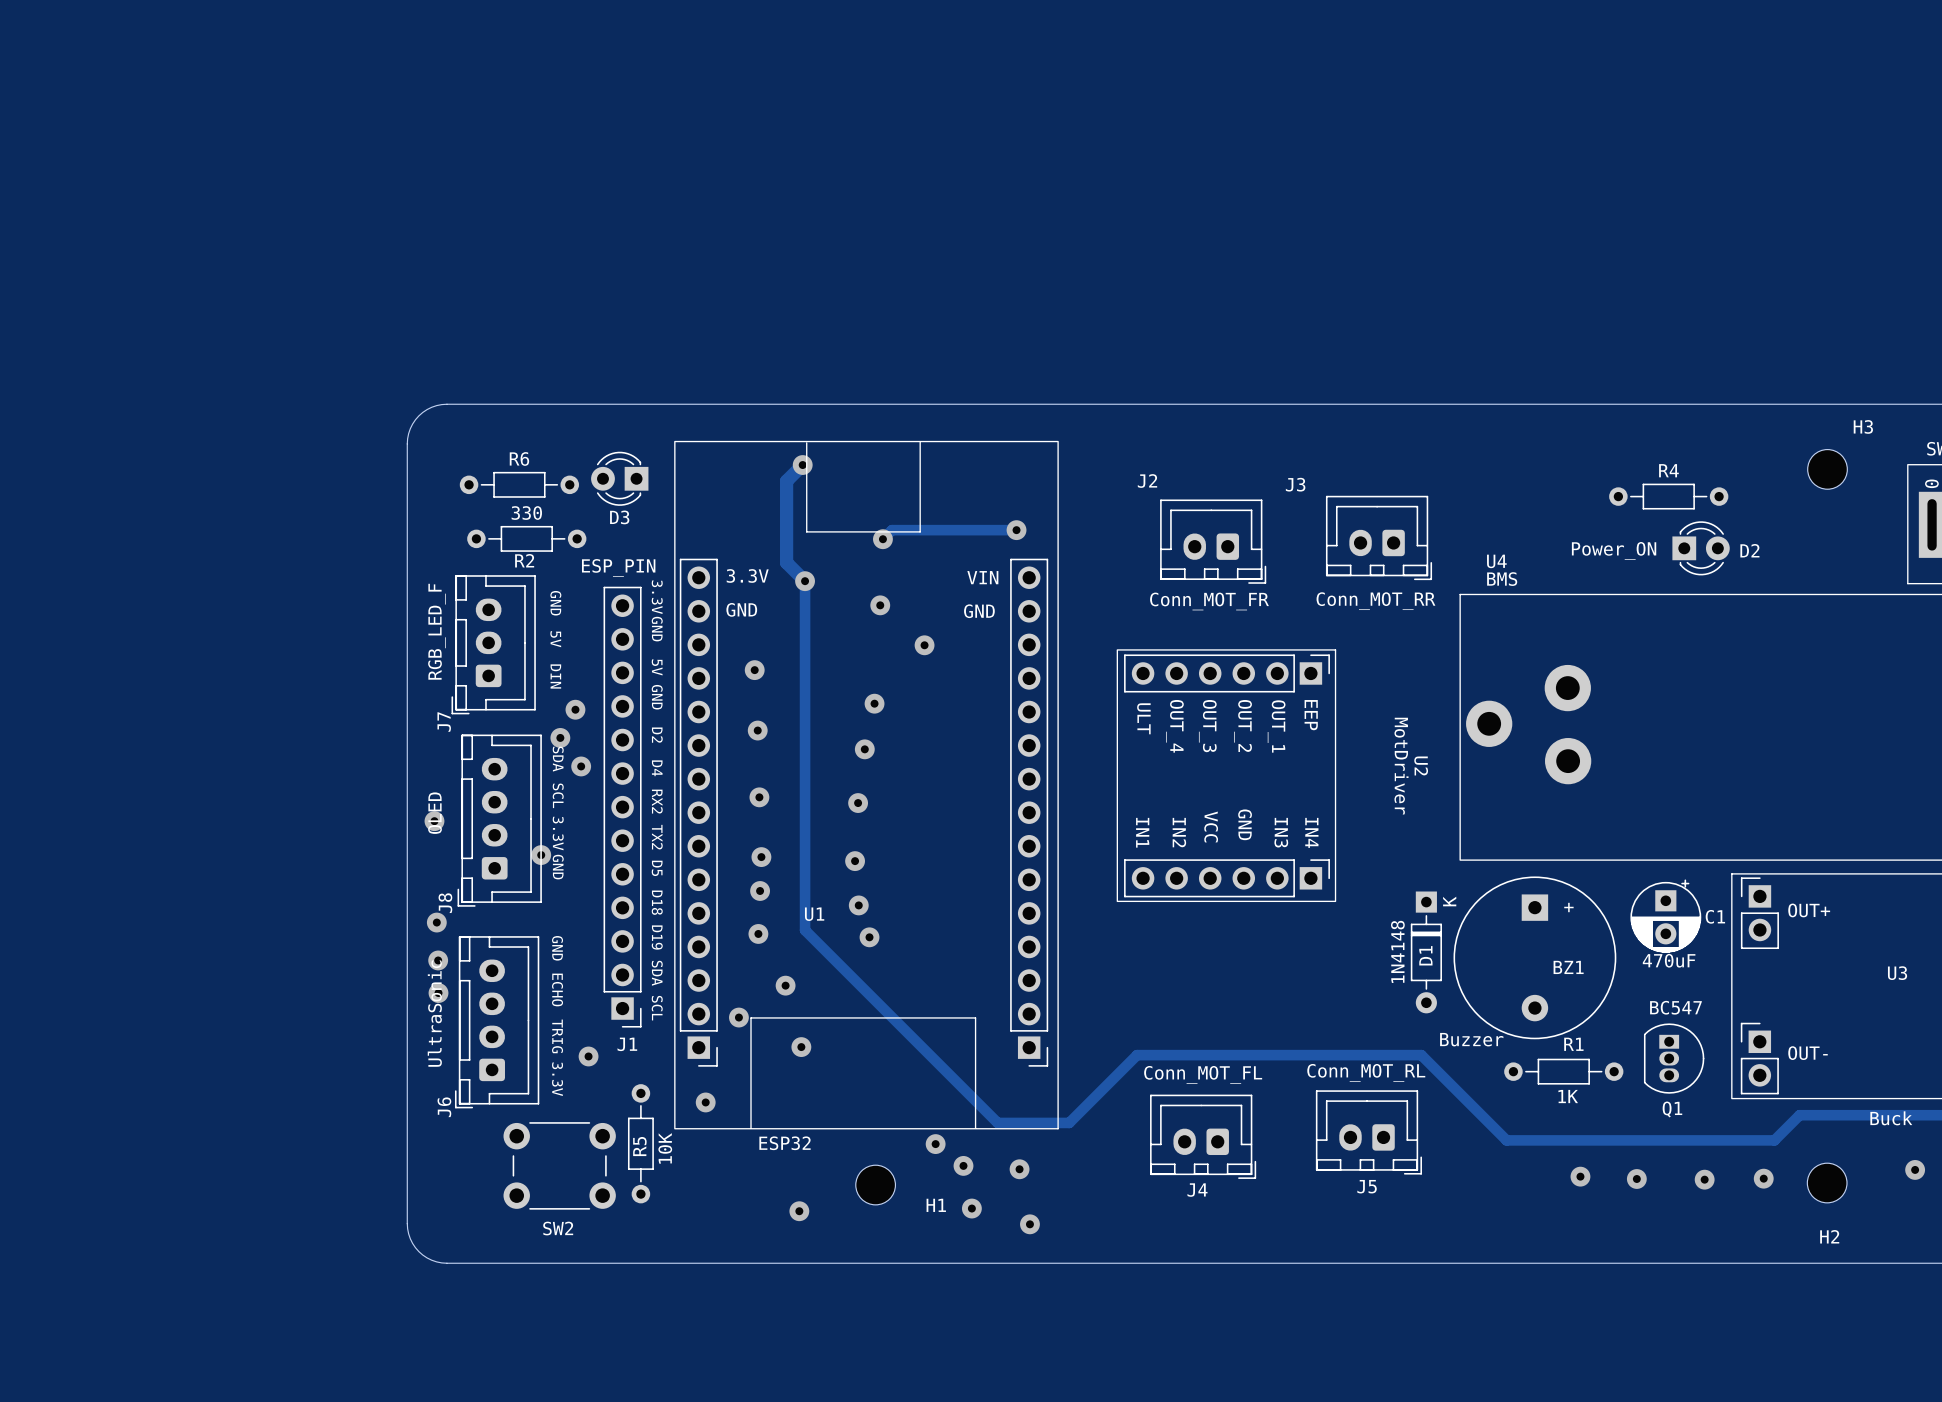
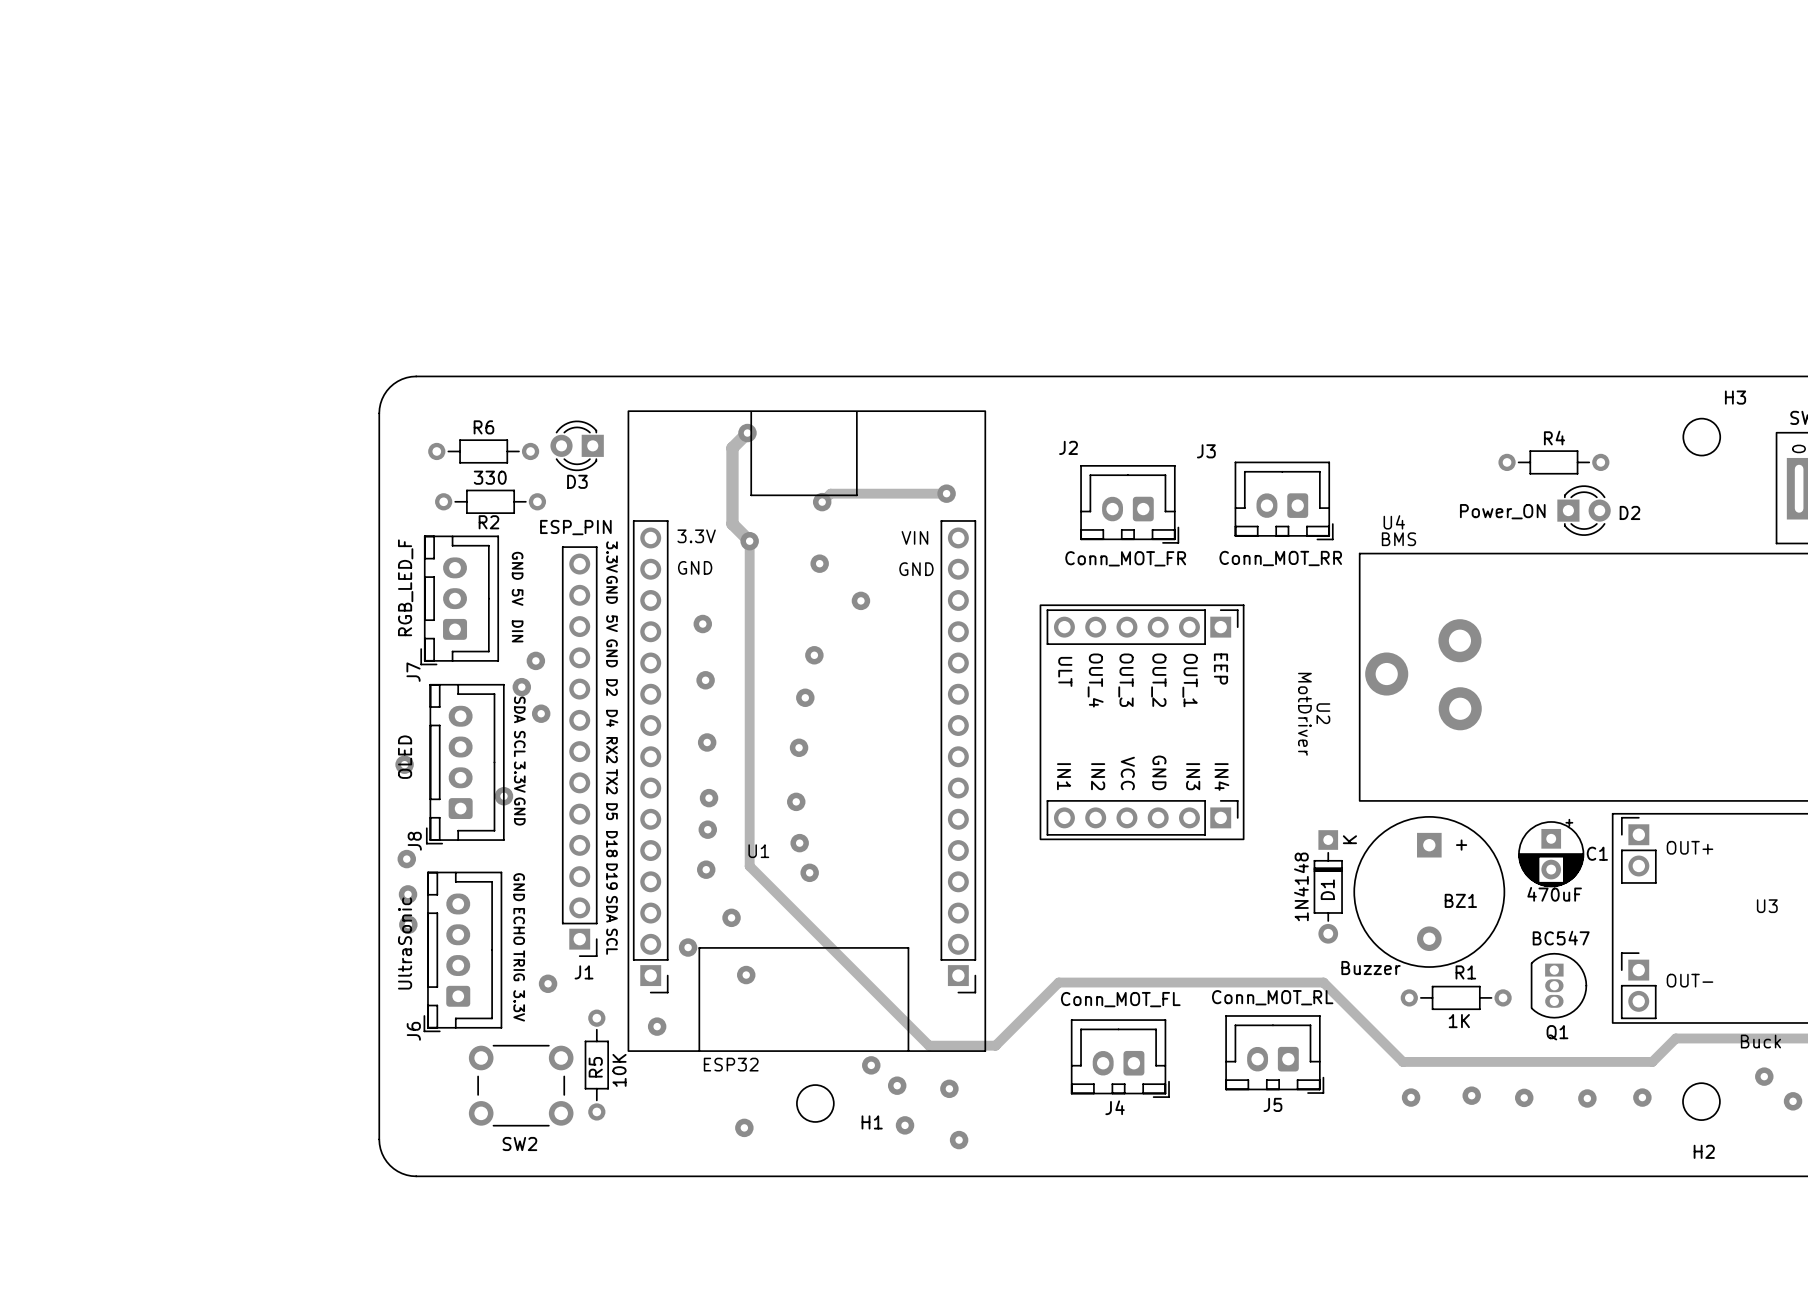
via: none -> (1764, 1076)
via: (1915, 1169) -> none
via: none -> (1411, 1097)
via: none -> (1793, 1101)

